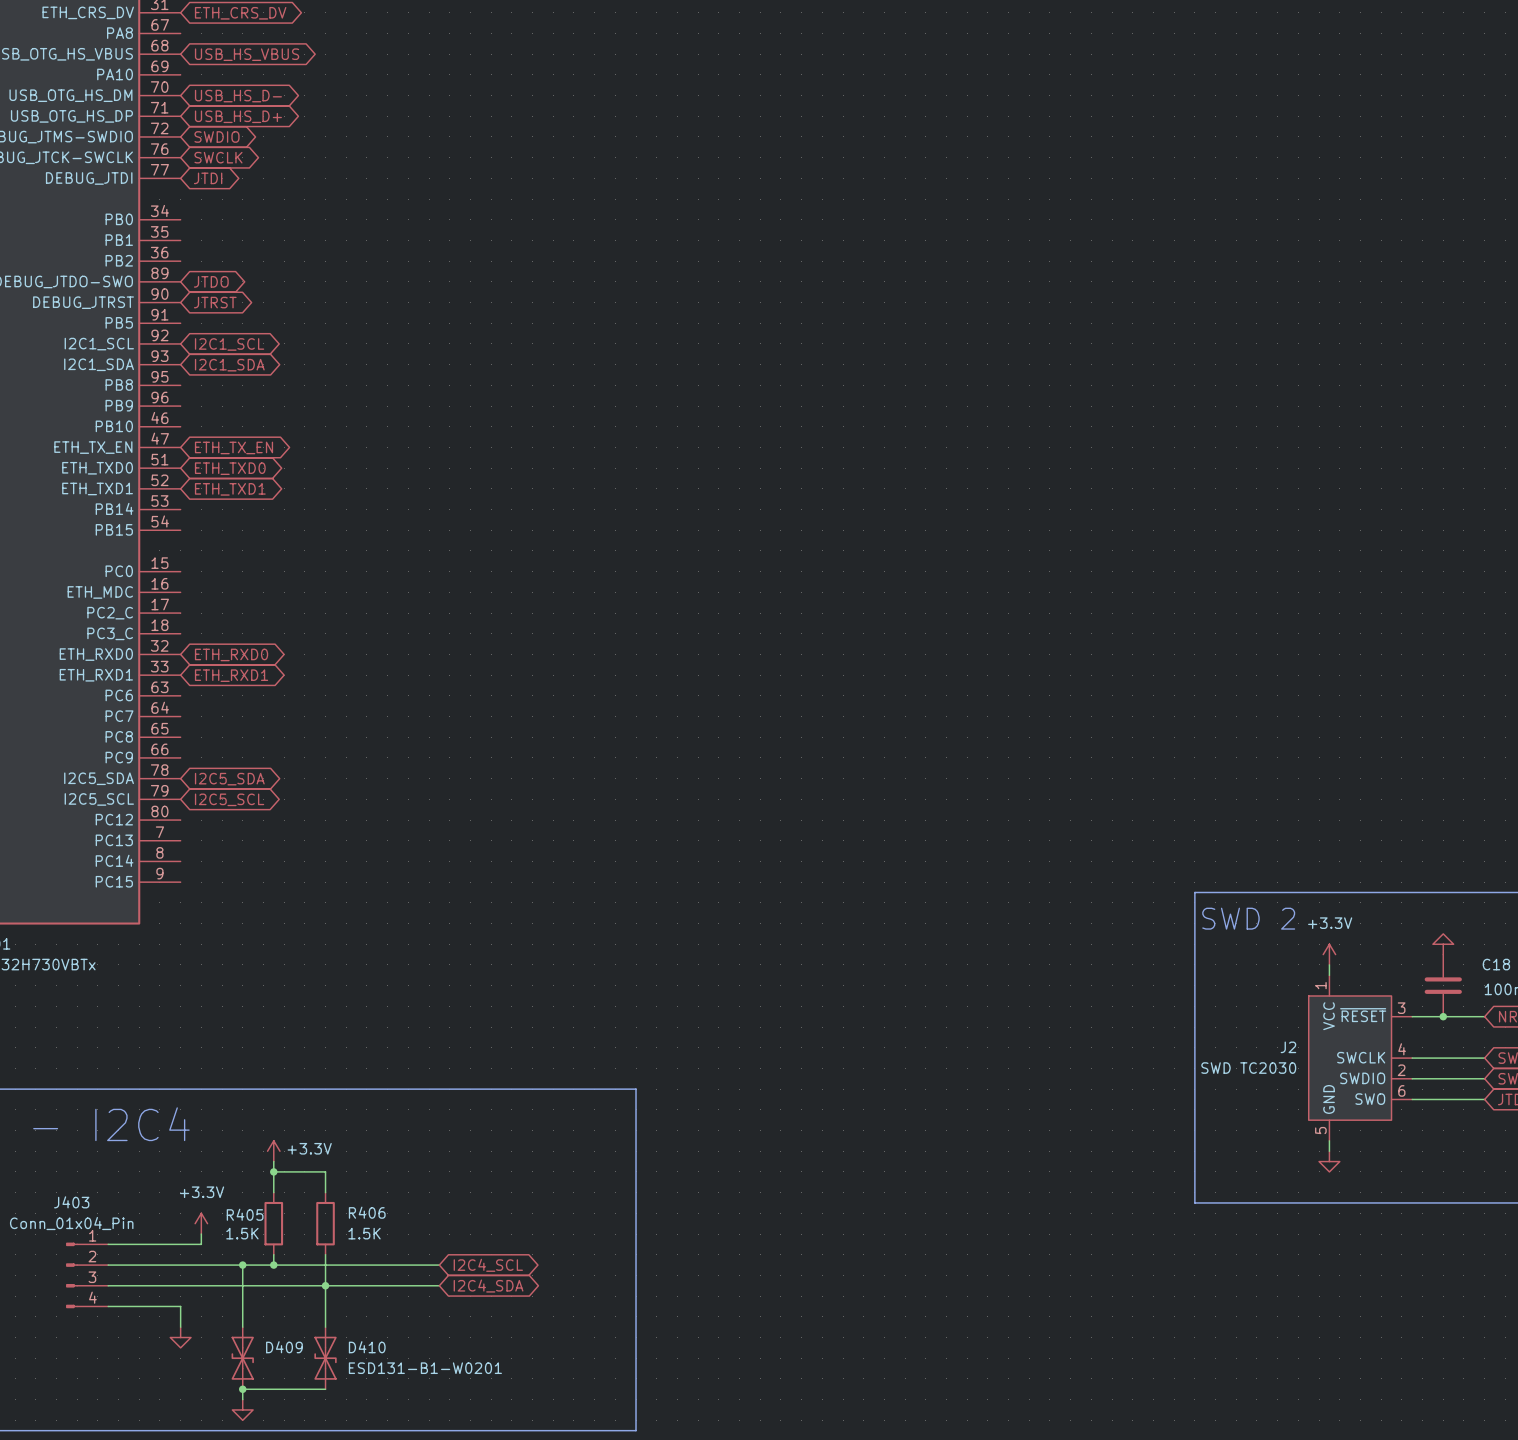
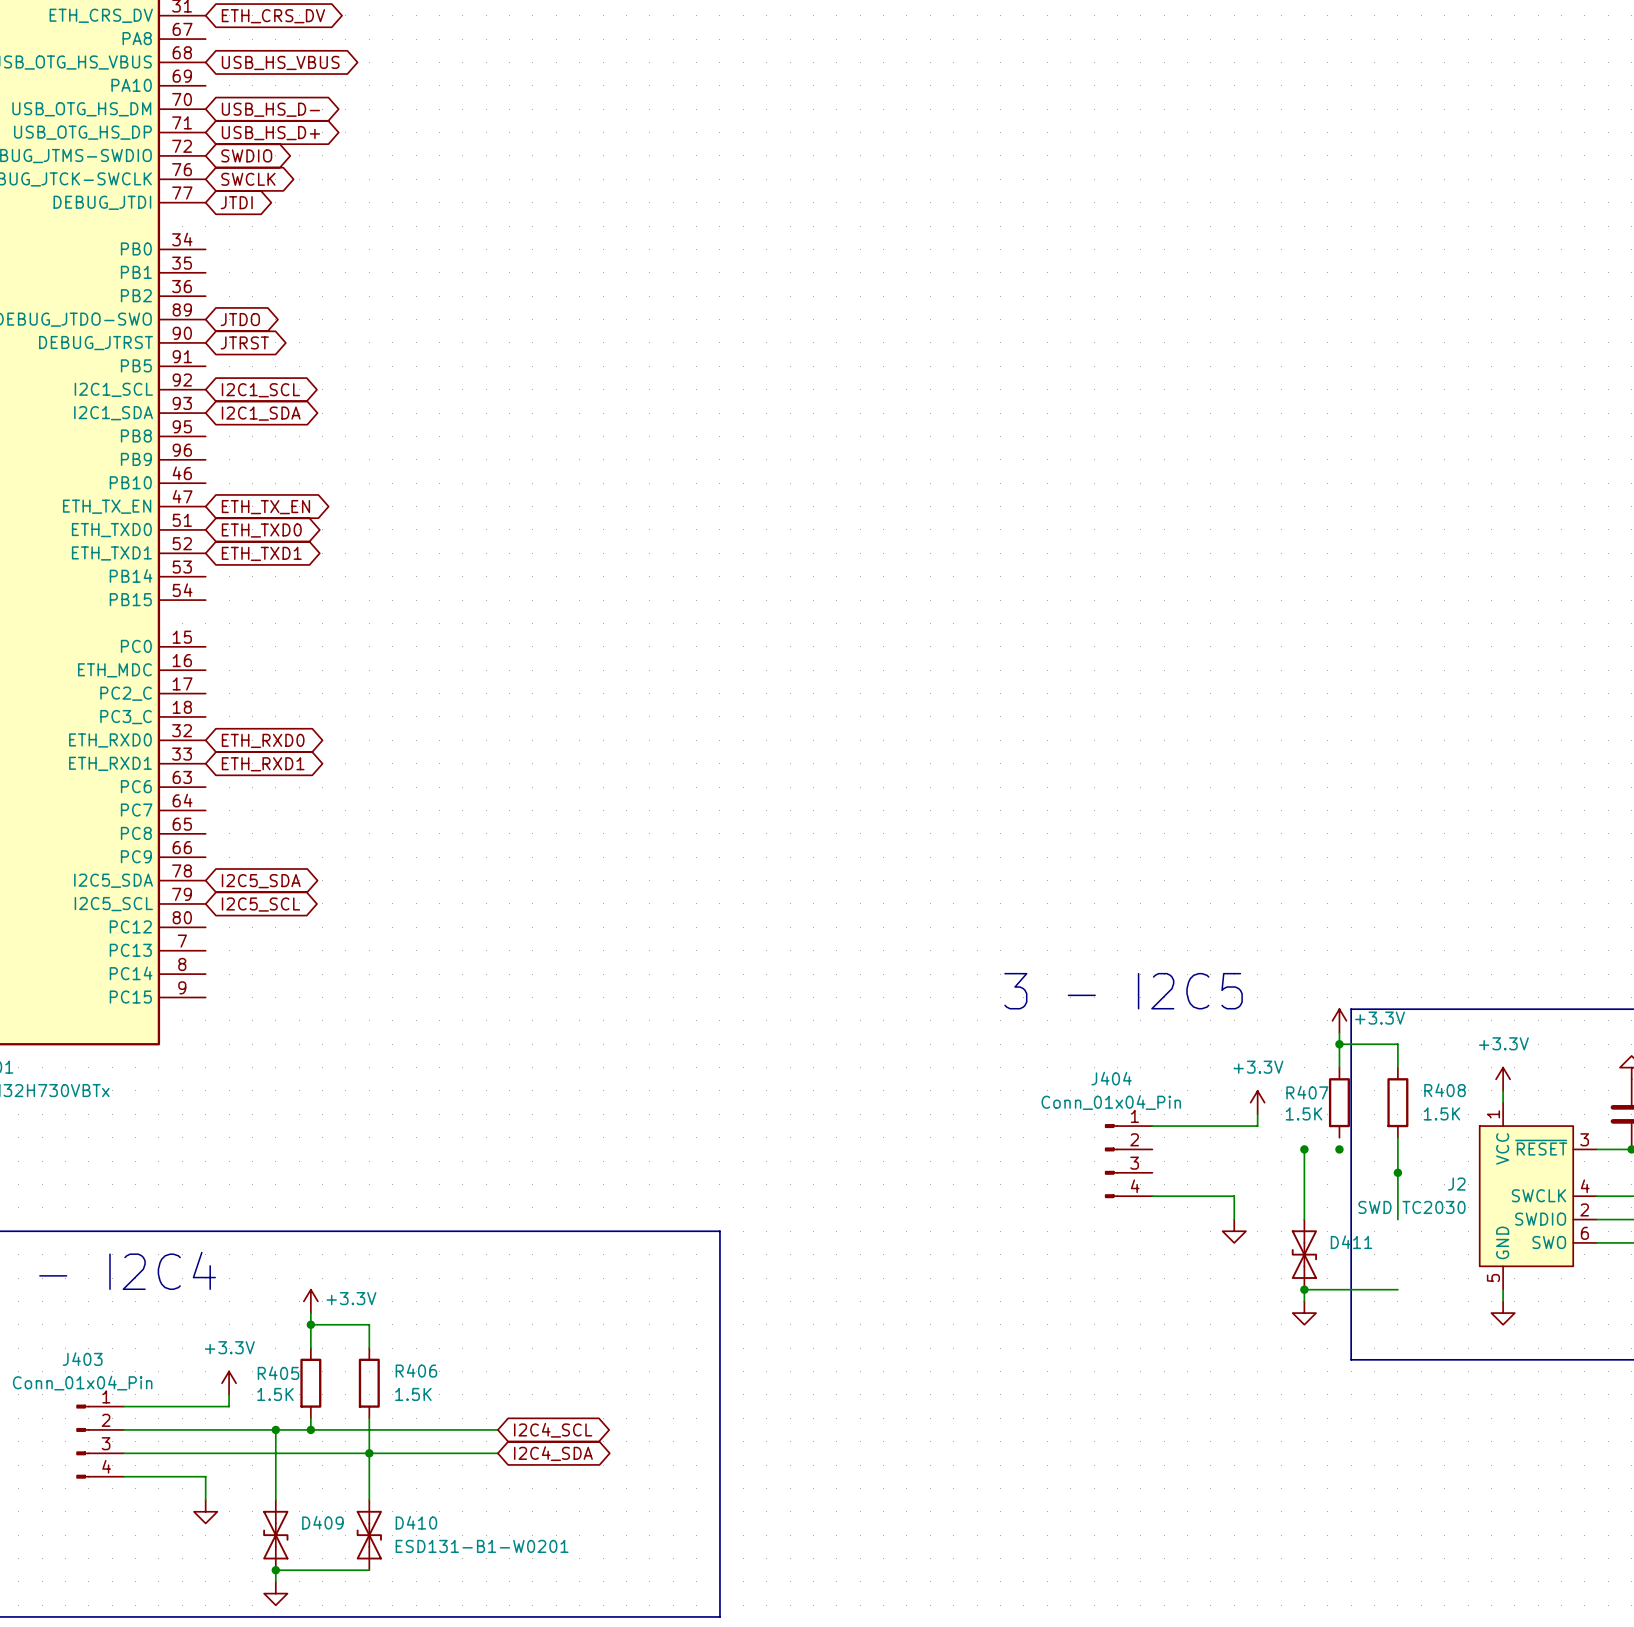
text: none -> 3 - I2C5 (1123, 991)
power symbol: none -> +3.3V (1339, 1020)
wire: none -> (1339, 1032) (1339, 1067)
text: SWD 2 (1248, 918) -> none
wire: none -> (1339, 1044) (1397, 1044) (1397, 1067)
junction: none -> (1339, 1044)
power symbol: none -> +3.3V (1257, 1102)
R407: none -> 1.5K (1339, 1102)
R408: none -> 1.5K (1397, 1102)
wire: none -> (1257, 1114) (1257, 1126) (1152, 1126)
wire: none -> (1397, 1137) (1397, 1219)
wire: none -> (1304, 1149) (1304, 1219)
junction: none -> (1304, 1149)
junction: none -> (1339, 1149)
J404: none -> Conn_01x04_Pin (1128, 1161)
junction: none -> (1397, 1172)
wire: none -> (1152, 1196) (1234, 1196) (1234, 1219)
power symbol: none -> (1234, 1231)
D411: none -> (1304, 1254)
junction: none -> (1304, 1289)
wire: none -> (1397, 1289) (1304, 1289) (1304, 1301)
power symbol: none -> (1304, 1313)

